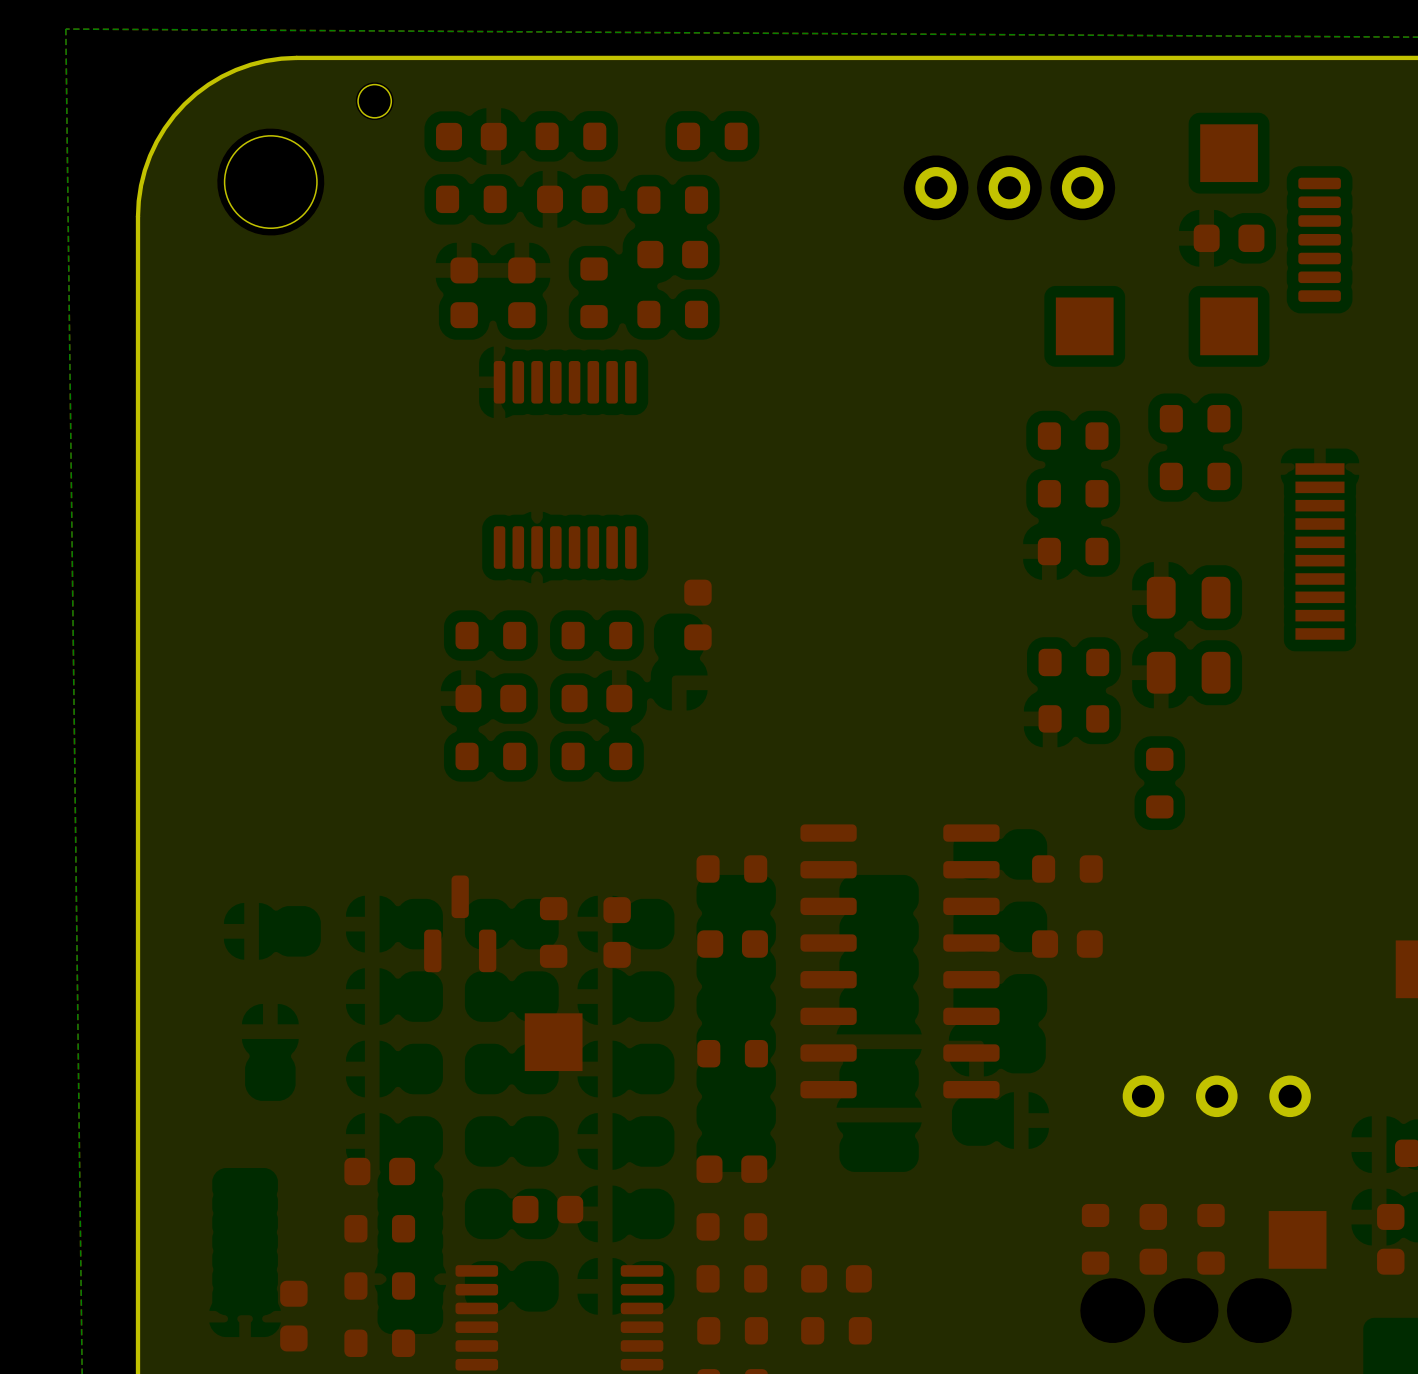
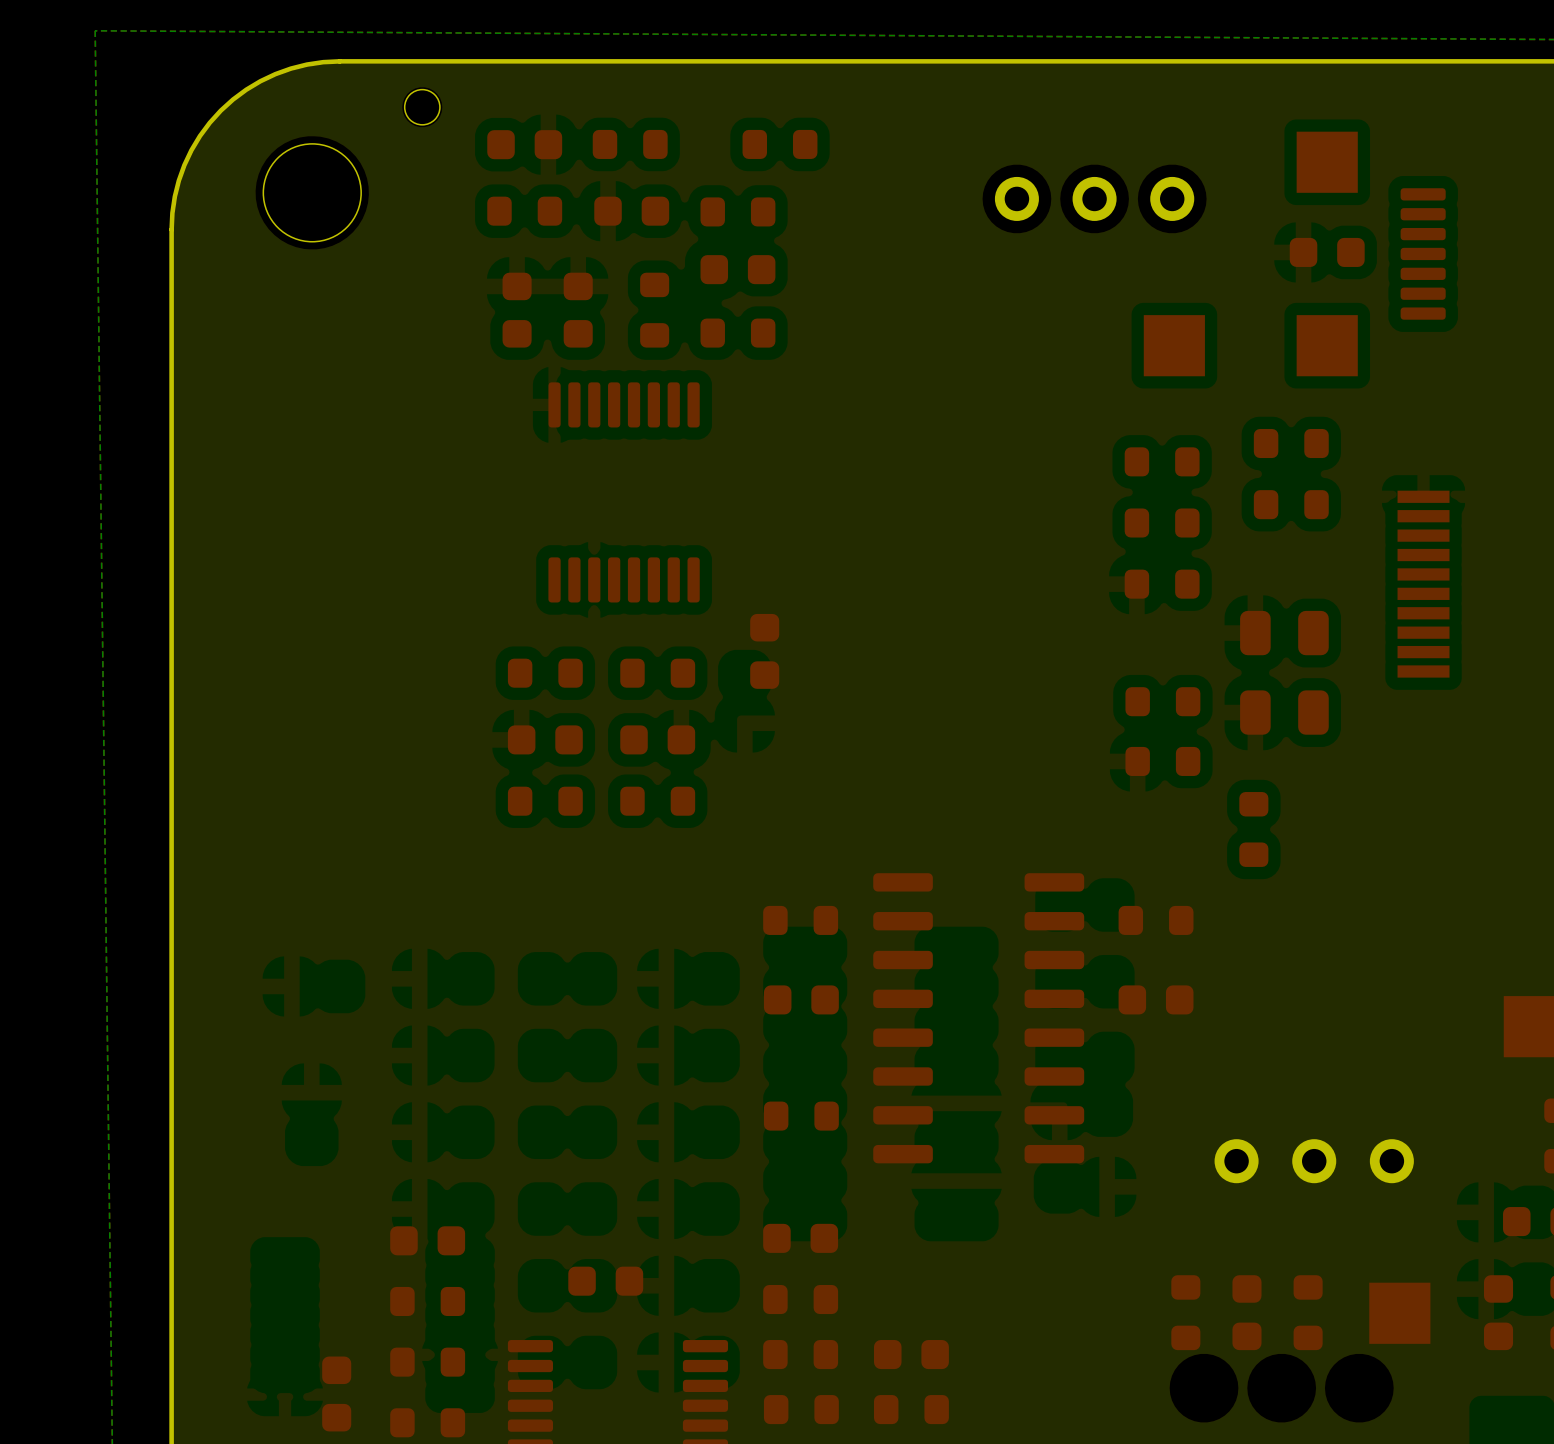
part: (460, 923) -> none
part: (553, 932) -> none
part: (617, 932) -> none
part: (553, 1042) -> none

